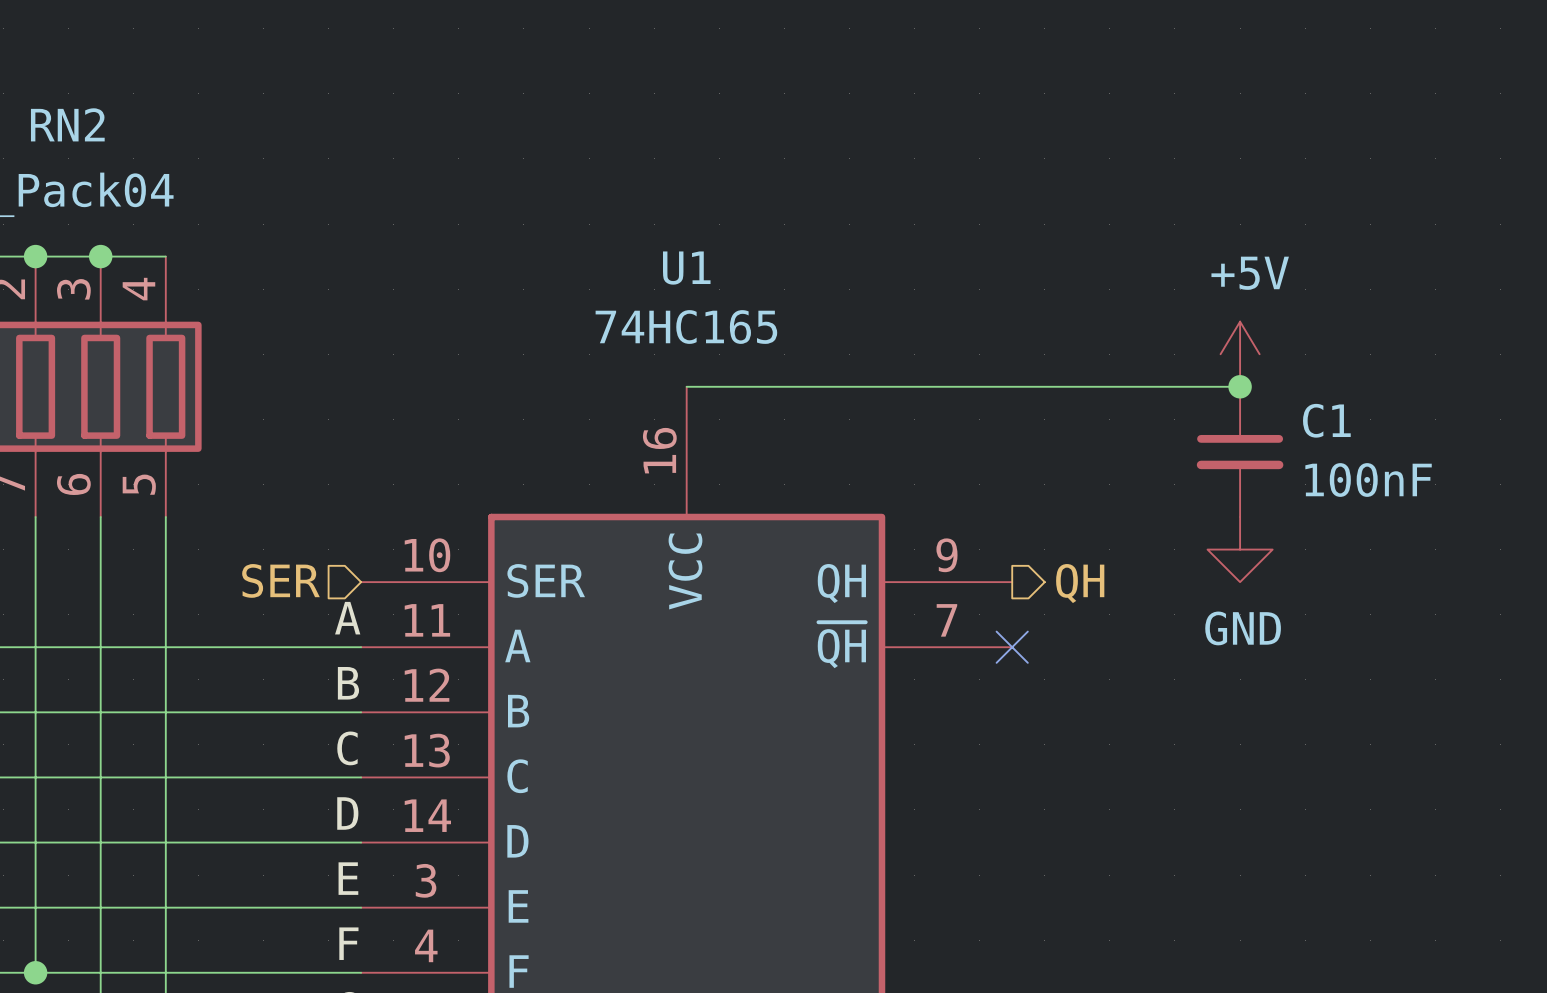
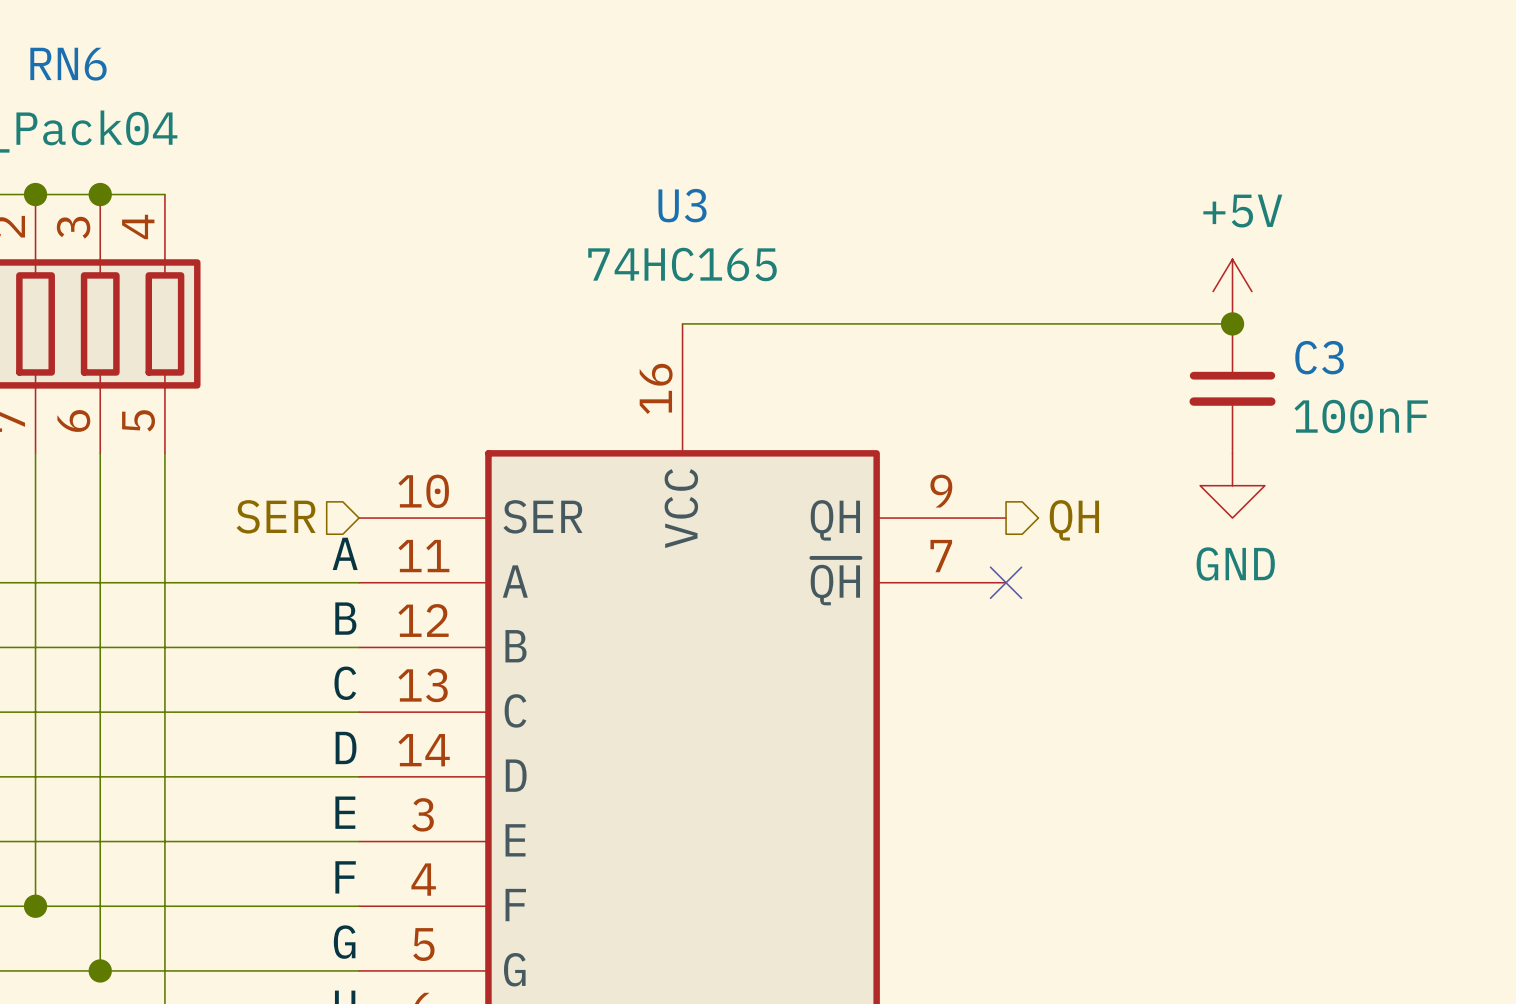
RN2 name: RN2 (67, 124) -> RN6 (68, 64)
U1 name: U1 (686, 268) -> U3 (682, 205)
C1 name: C1 (1326, 420) -> C3 (1319, 357)

